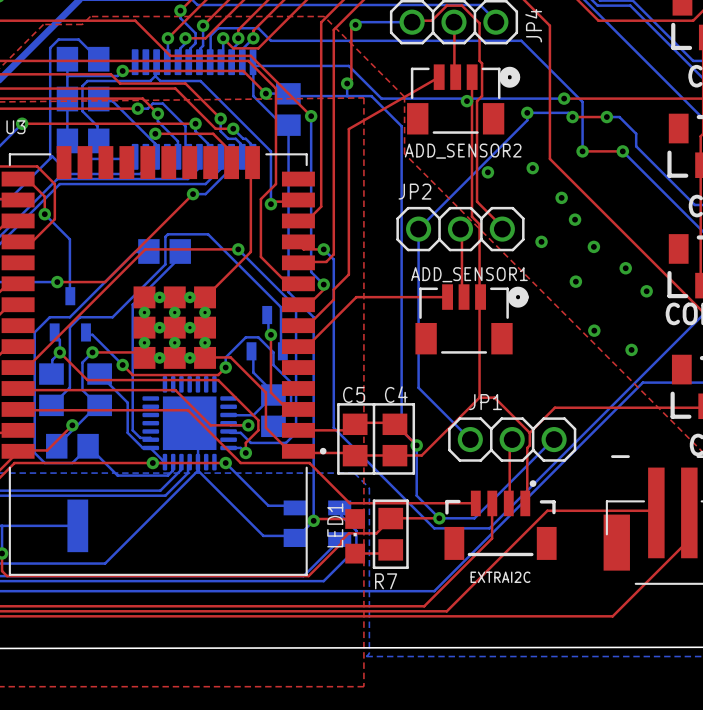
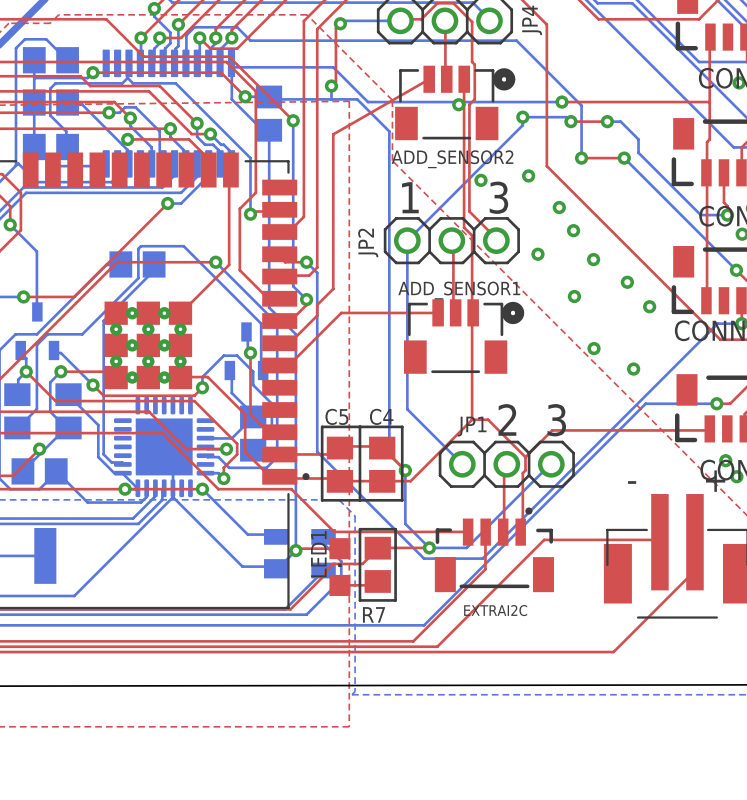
text: none -> 1 (410, 197)
text: none -> 3 (498, 197)
JP2 name rotation: 0° (414, 191) -> 90° counterclockwise (368, 242)
JP2 name position: JP2 (414, 191) -> JP2 (368, 242)
text: none -> 2 (507, 419)
text: none -> 3 (556, 420)

